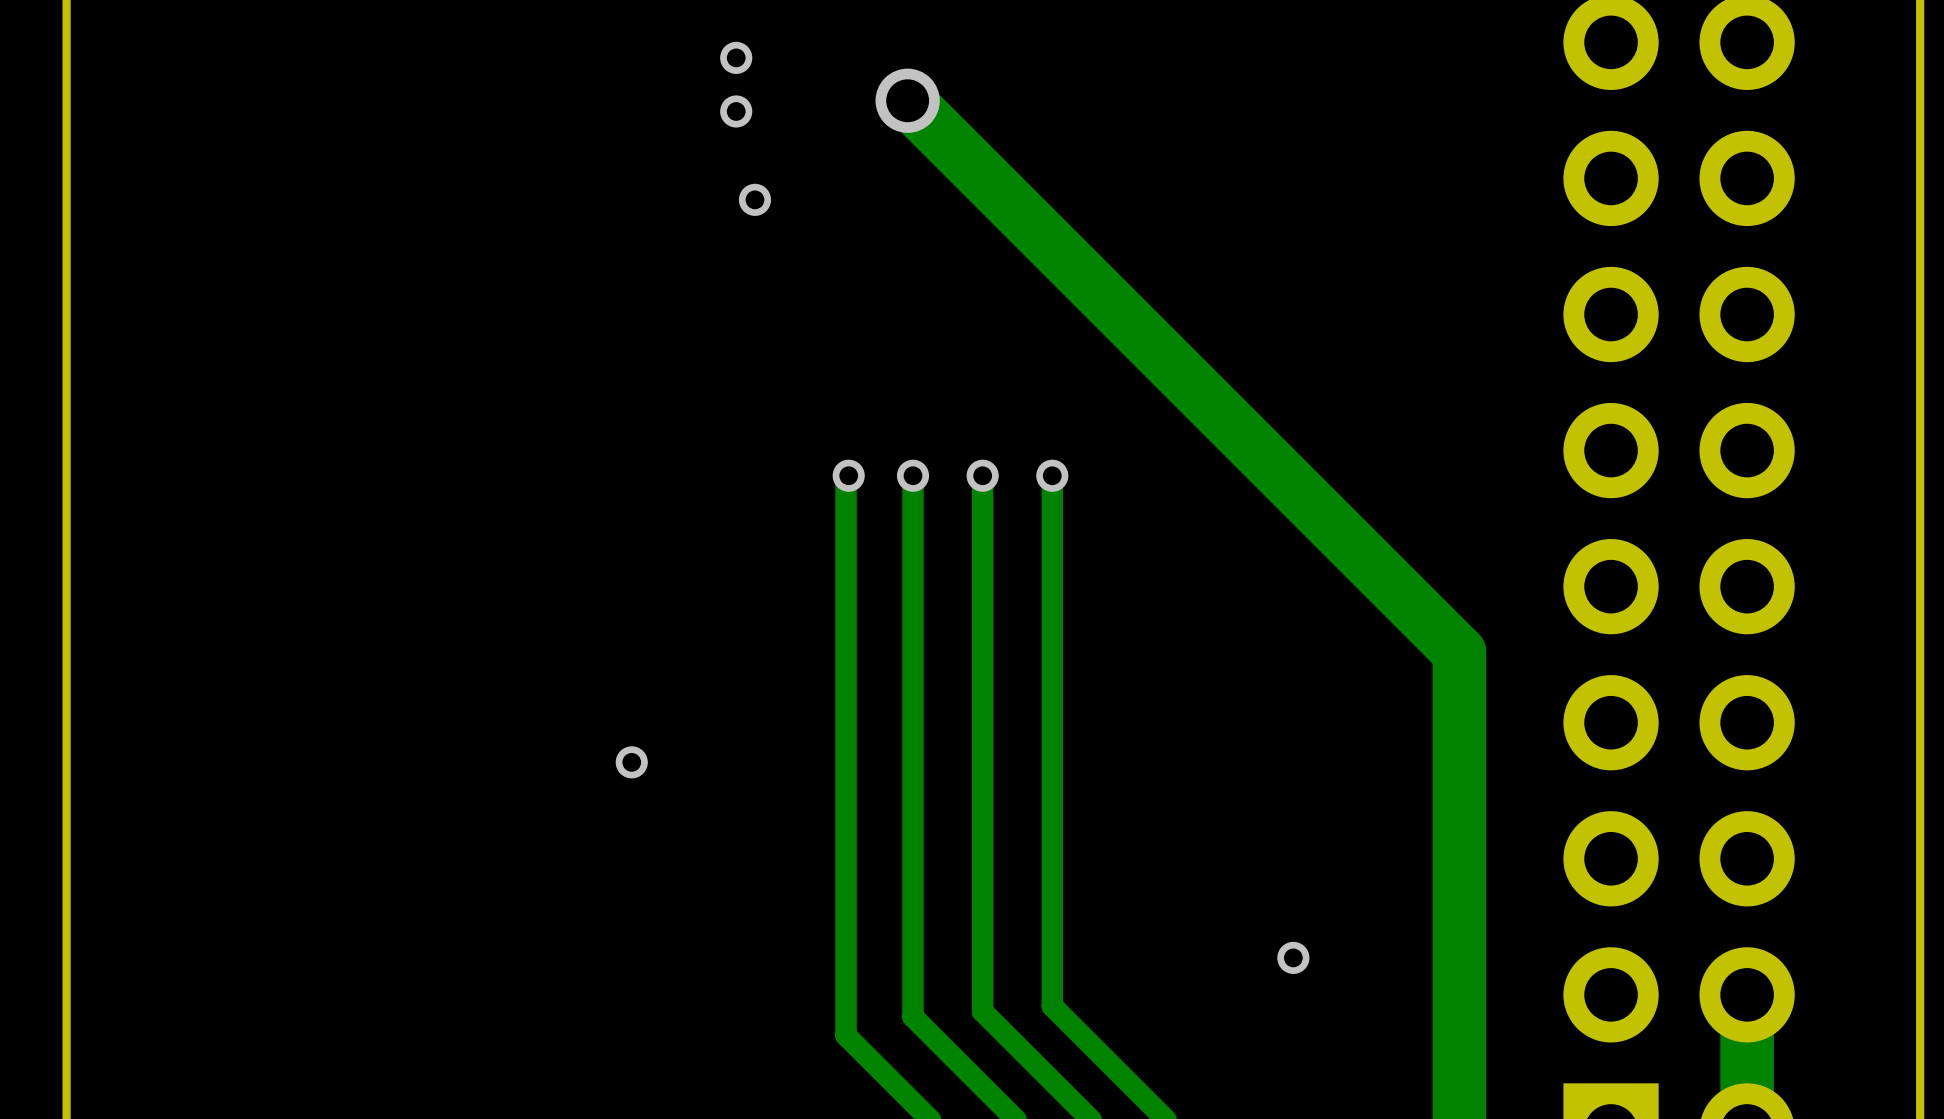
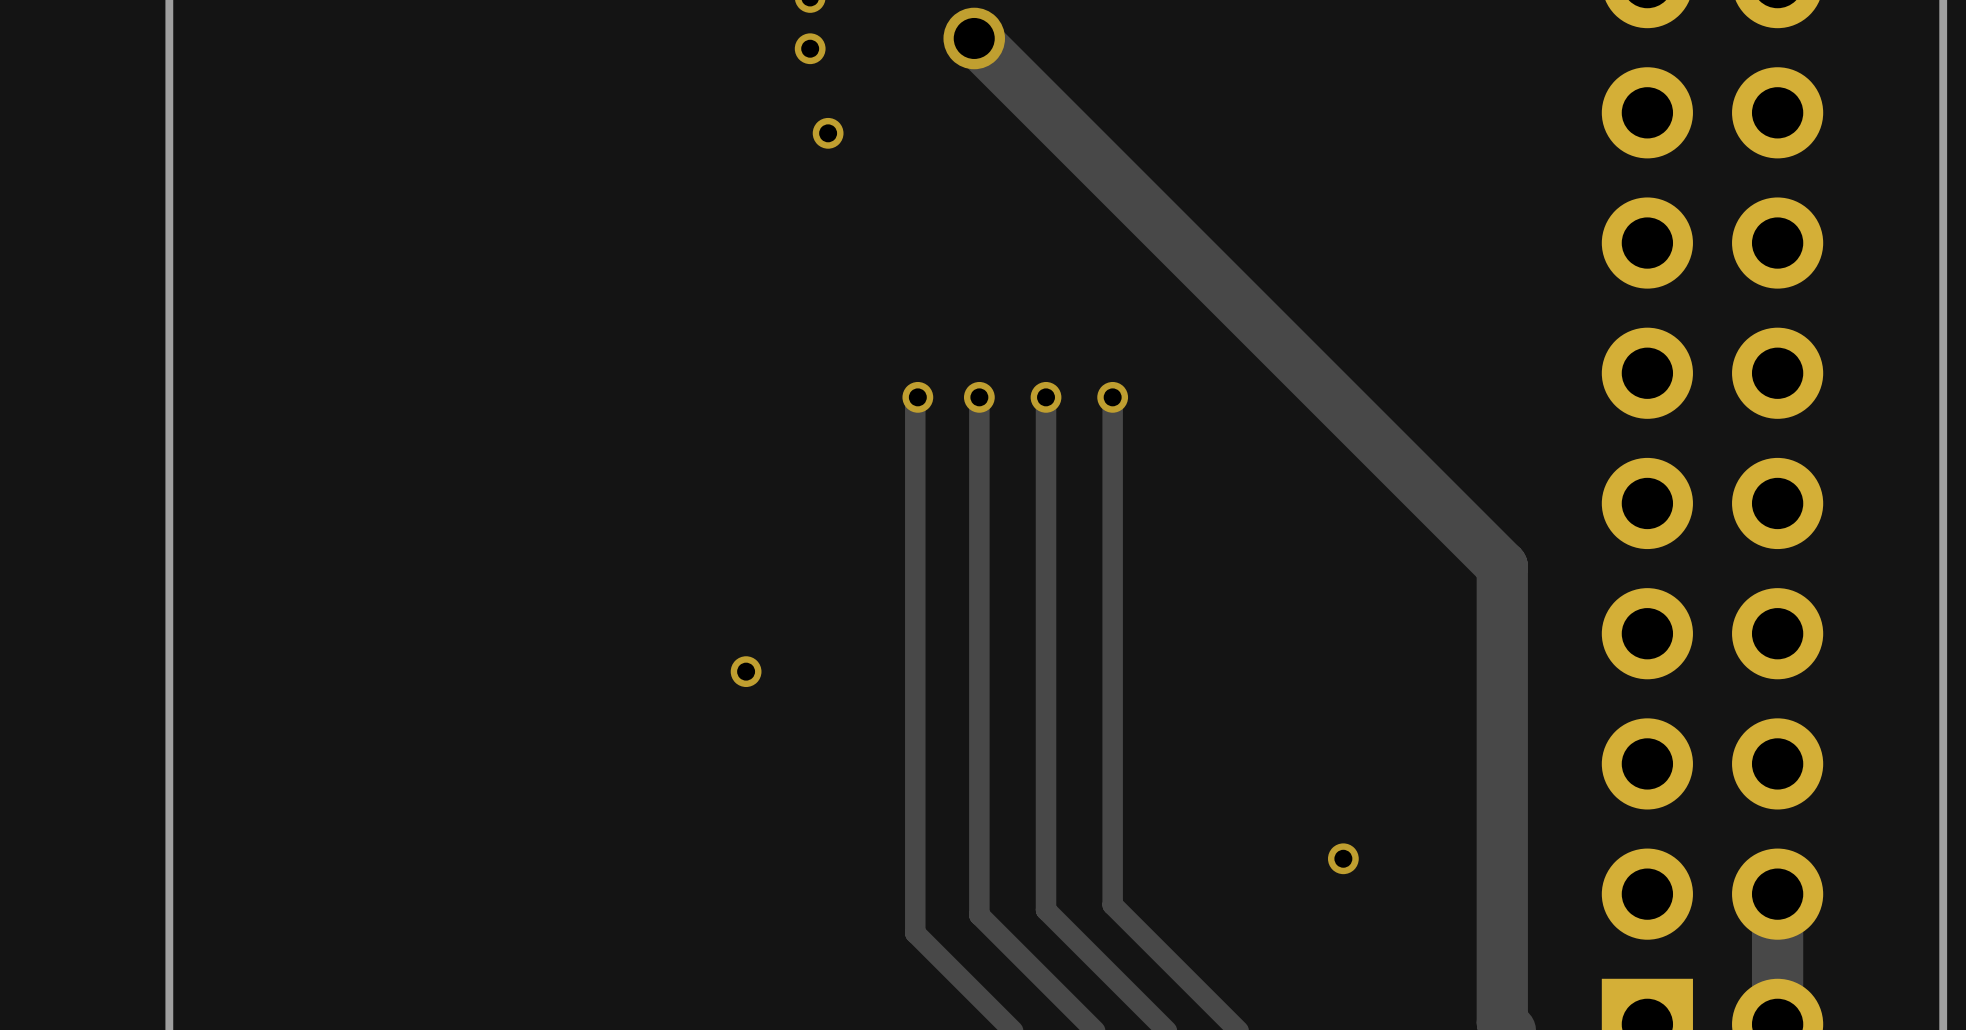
via position: (631, 762) -> (746, 671)

